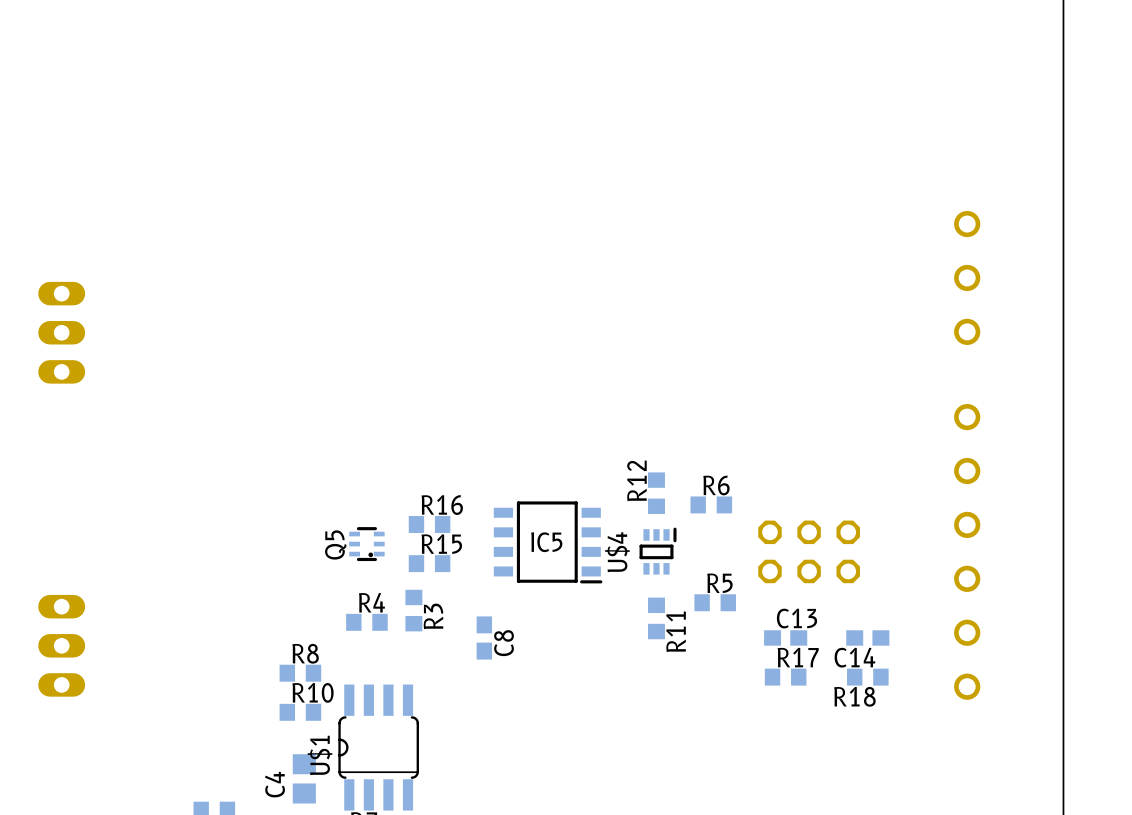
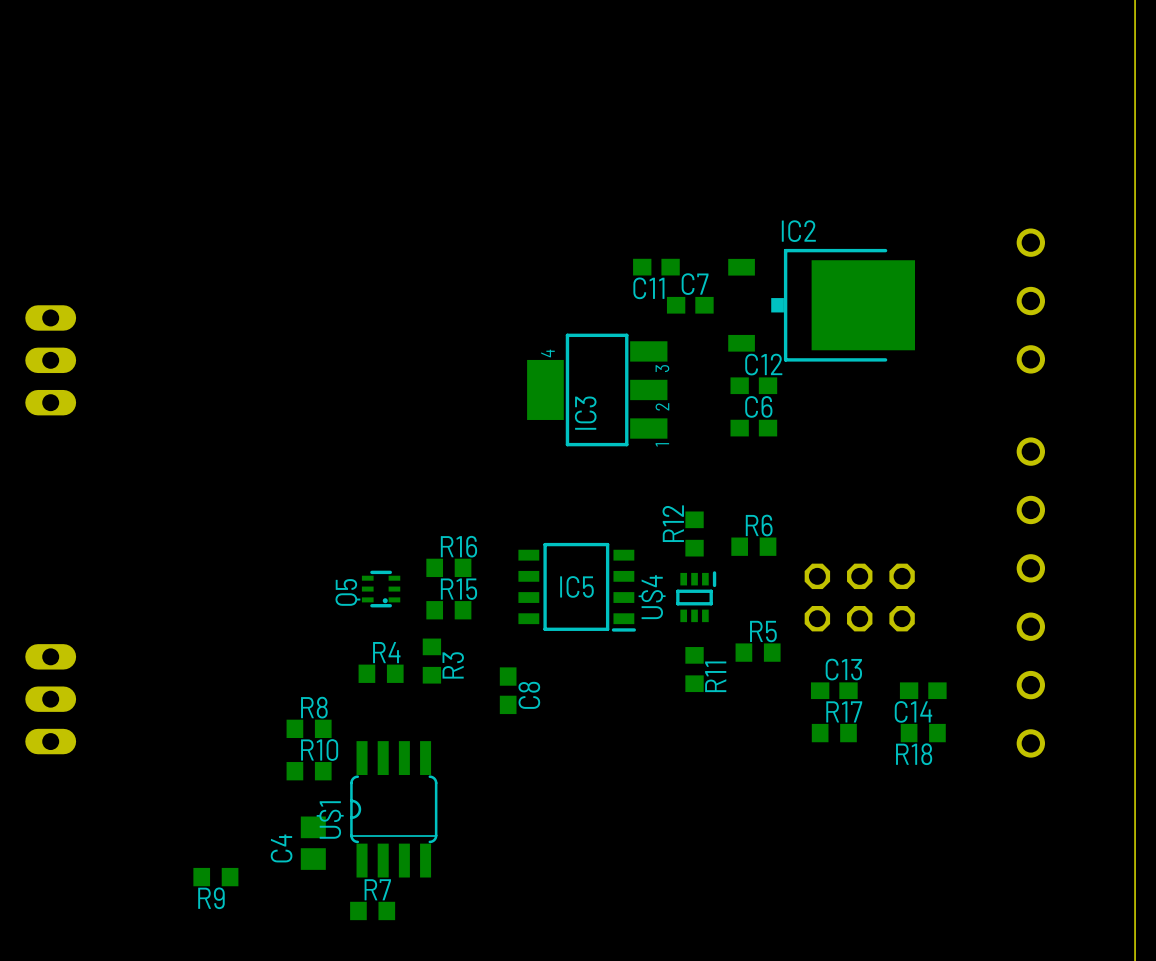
C11: none -> (656, 267)
C7: none -> (690, 305)
IC2: none -> (821, 305)
C12: none -> (753, 385)
IC3: none -> (597, 389)
C6: none -> (753, 428)

